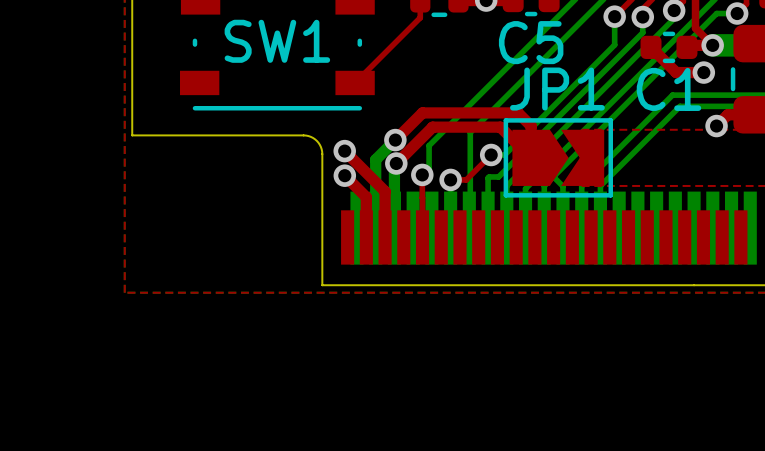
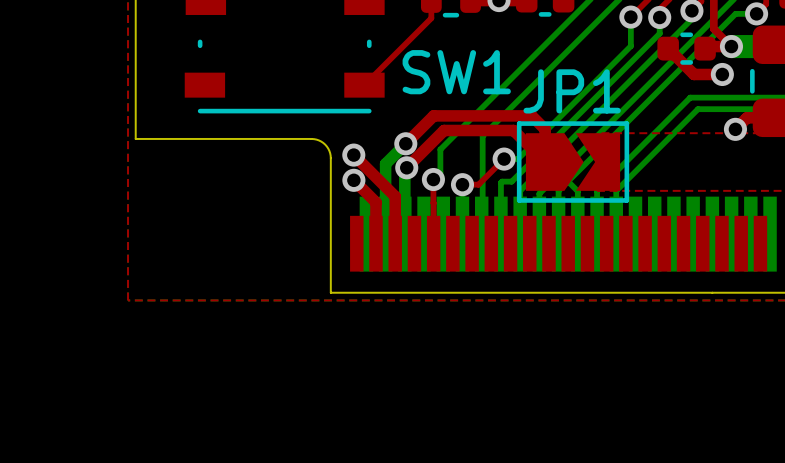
SW1 name position: SW1 (277, 41) -> SW1 (456, 72)
C5 name: C5 (531, 42) -> none
C1 name: C1 (668, 89) -> none

